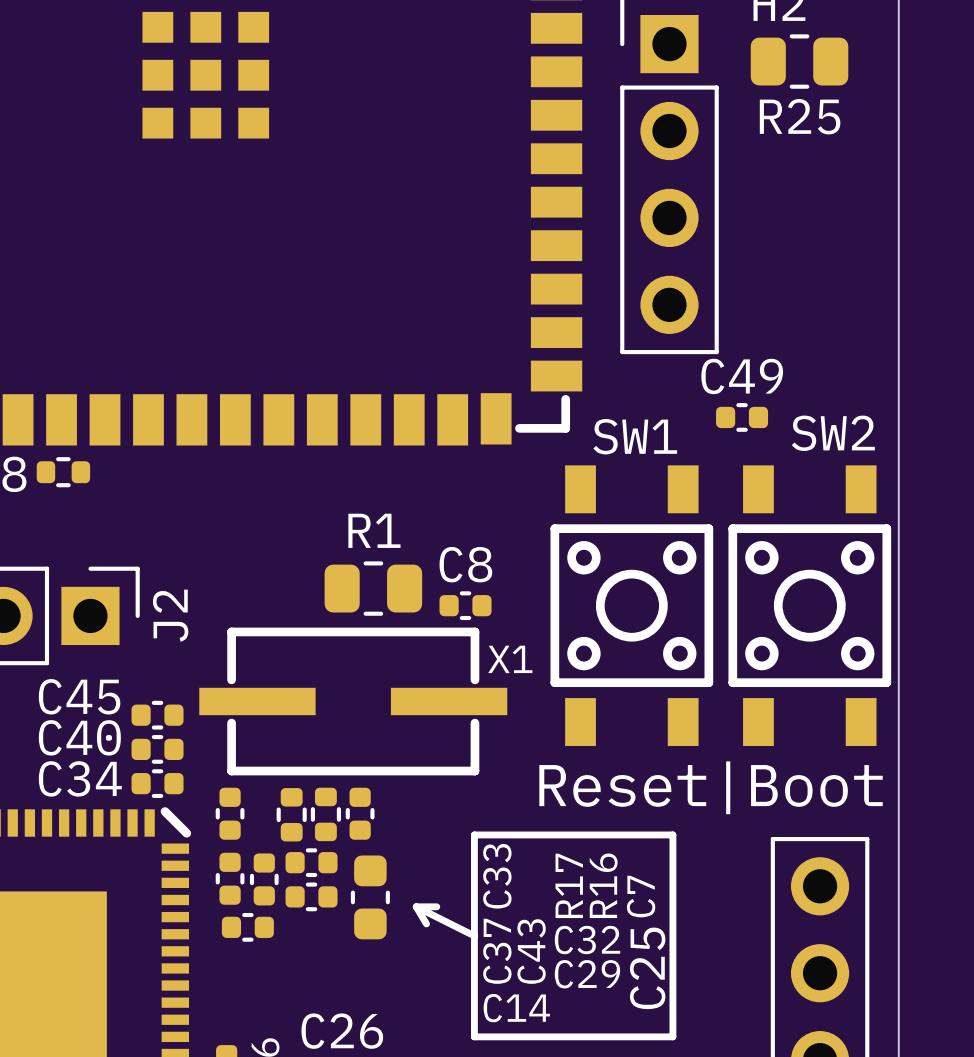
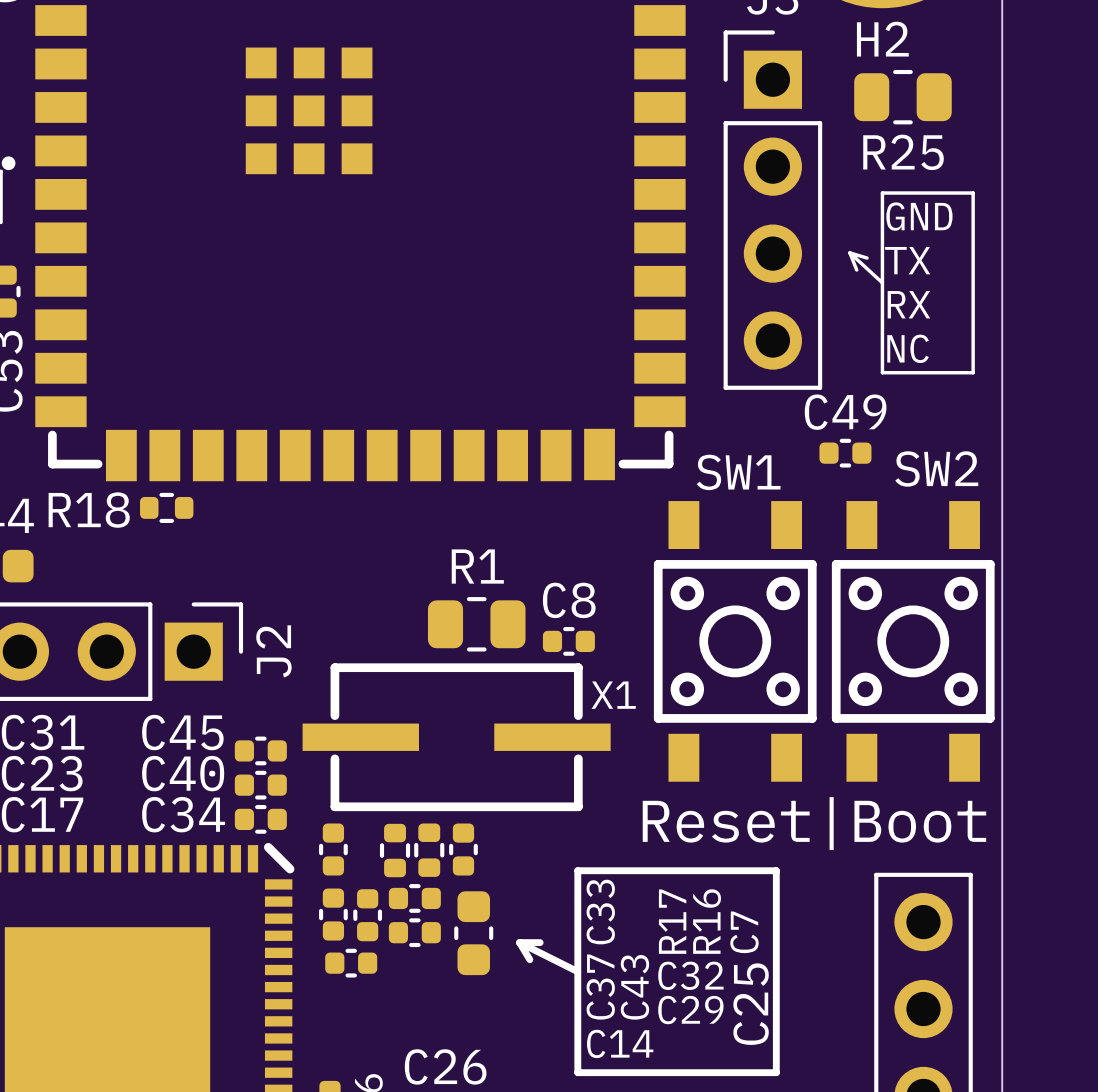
line: none -> (882, 193) (973, 193) (973, 372) (882, 372) (882, 193)
text: none -> GND (919, 216)
line: none -> (849, 252) (867, 258)
line: none -> (849, 252) (856, 270)
line: none -> (849, 252) (882, 282)
text: none -> TX (907, 260)
text: none -> RX (908, 304)
text: none -> NC (908, 348)

